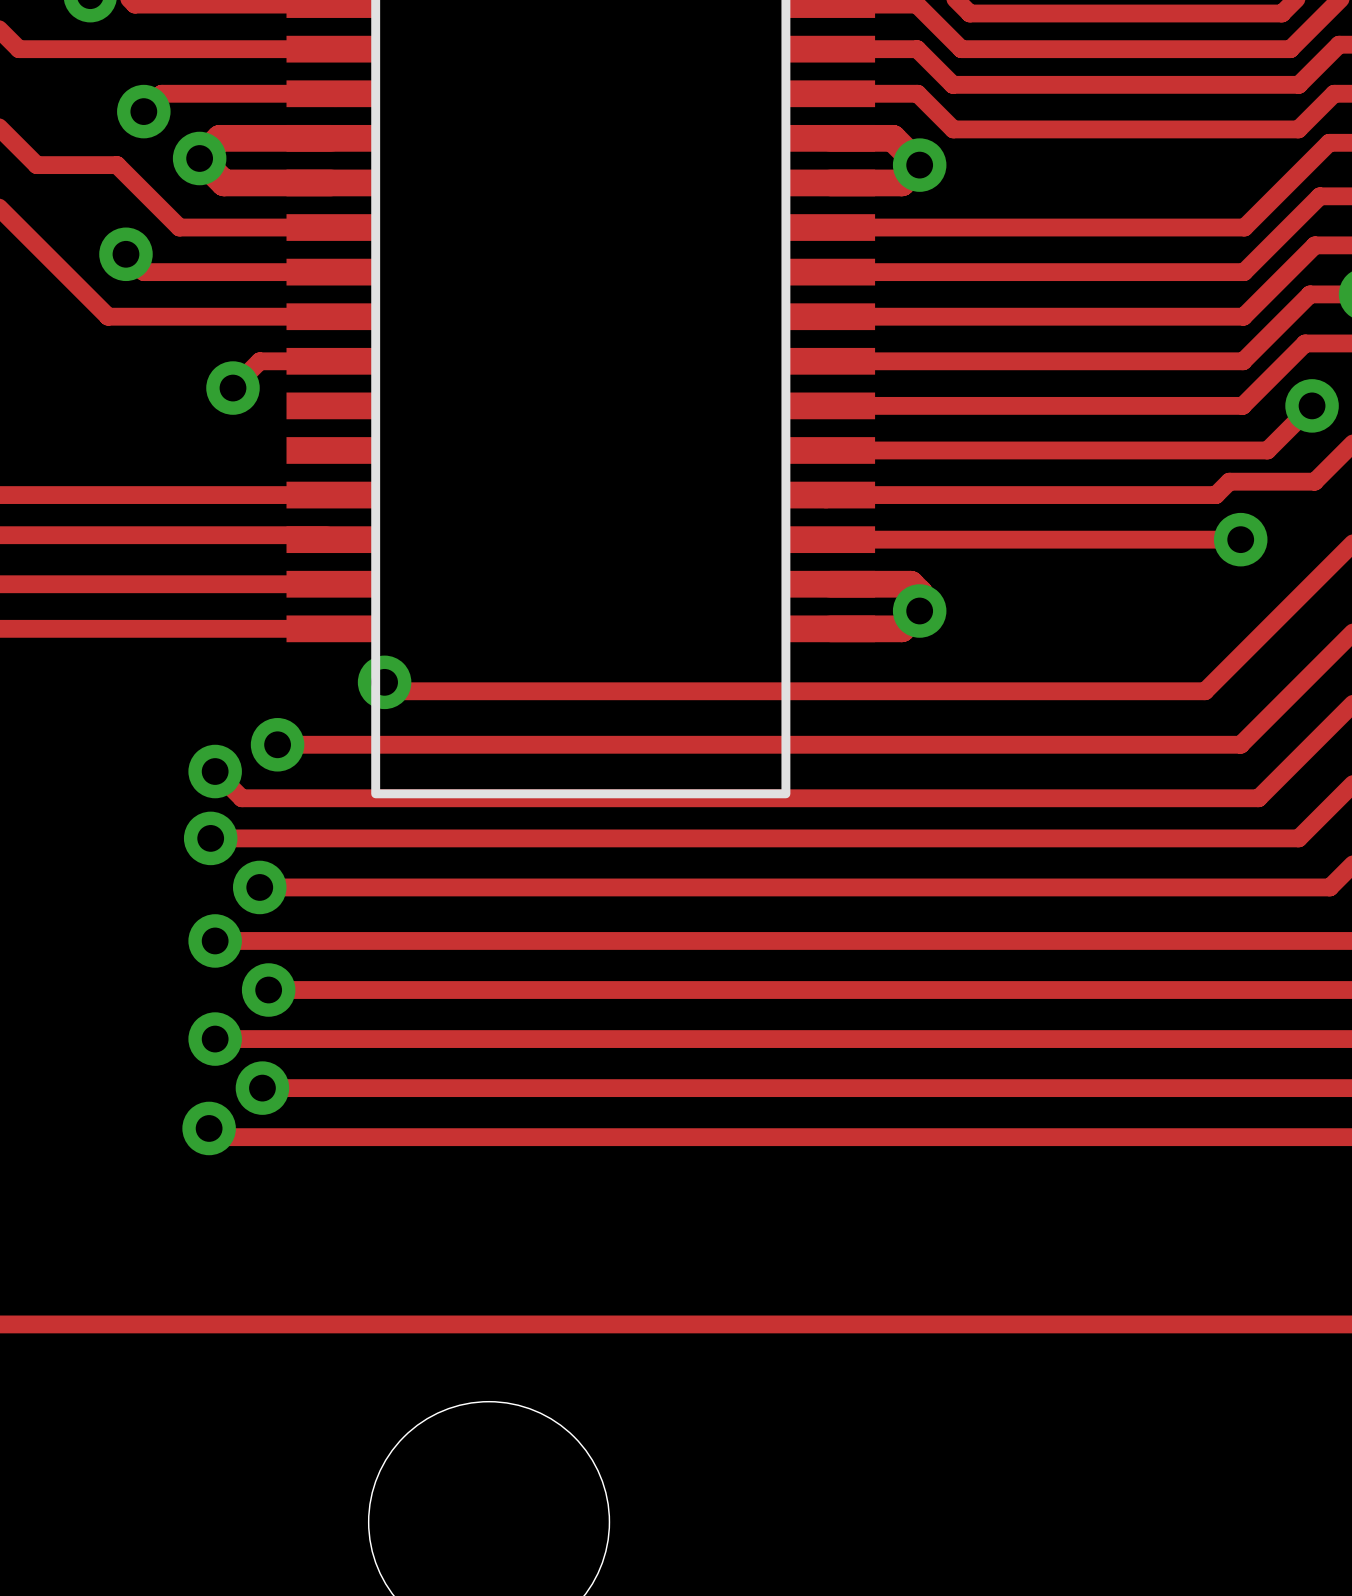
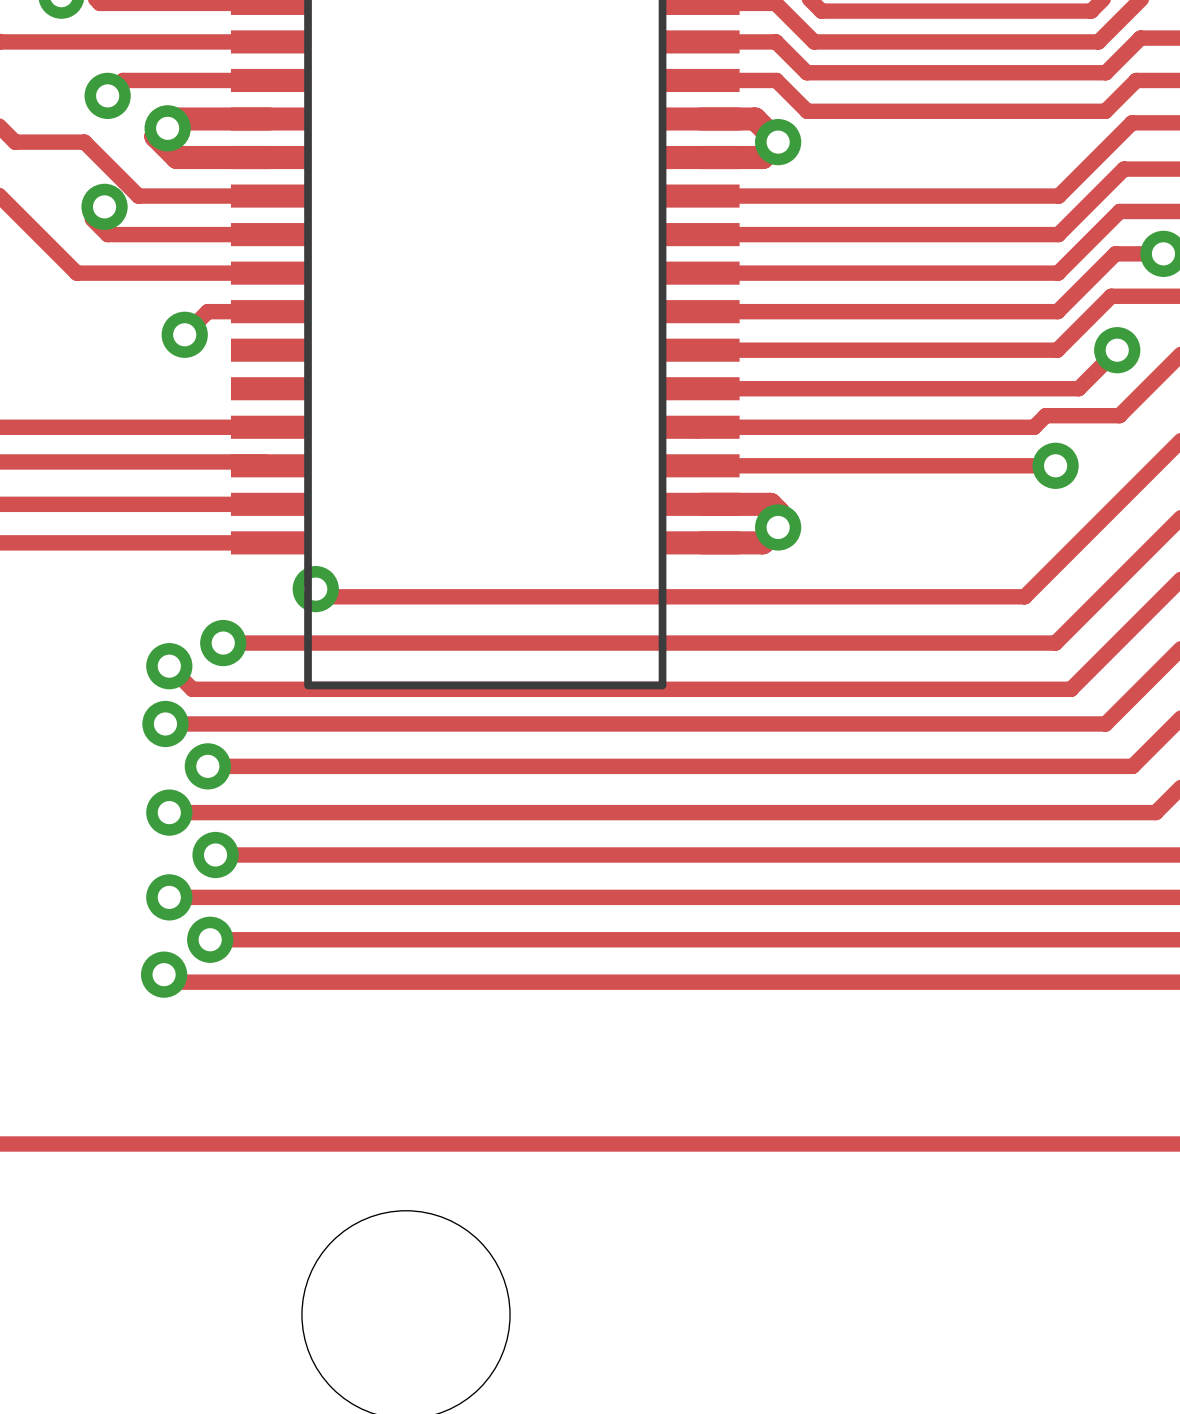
via position: (199, 158) -> (167, 128)
via position: (125, 254) -> (104, 206)

